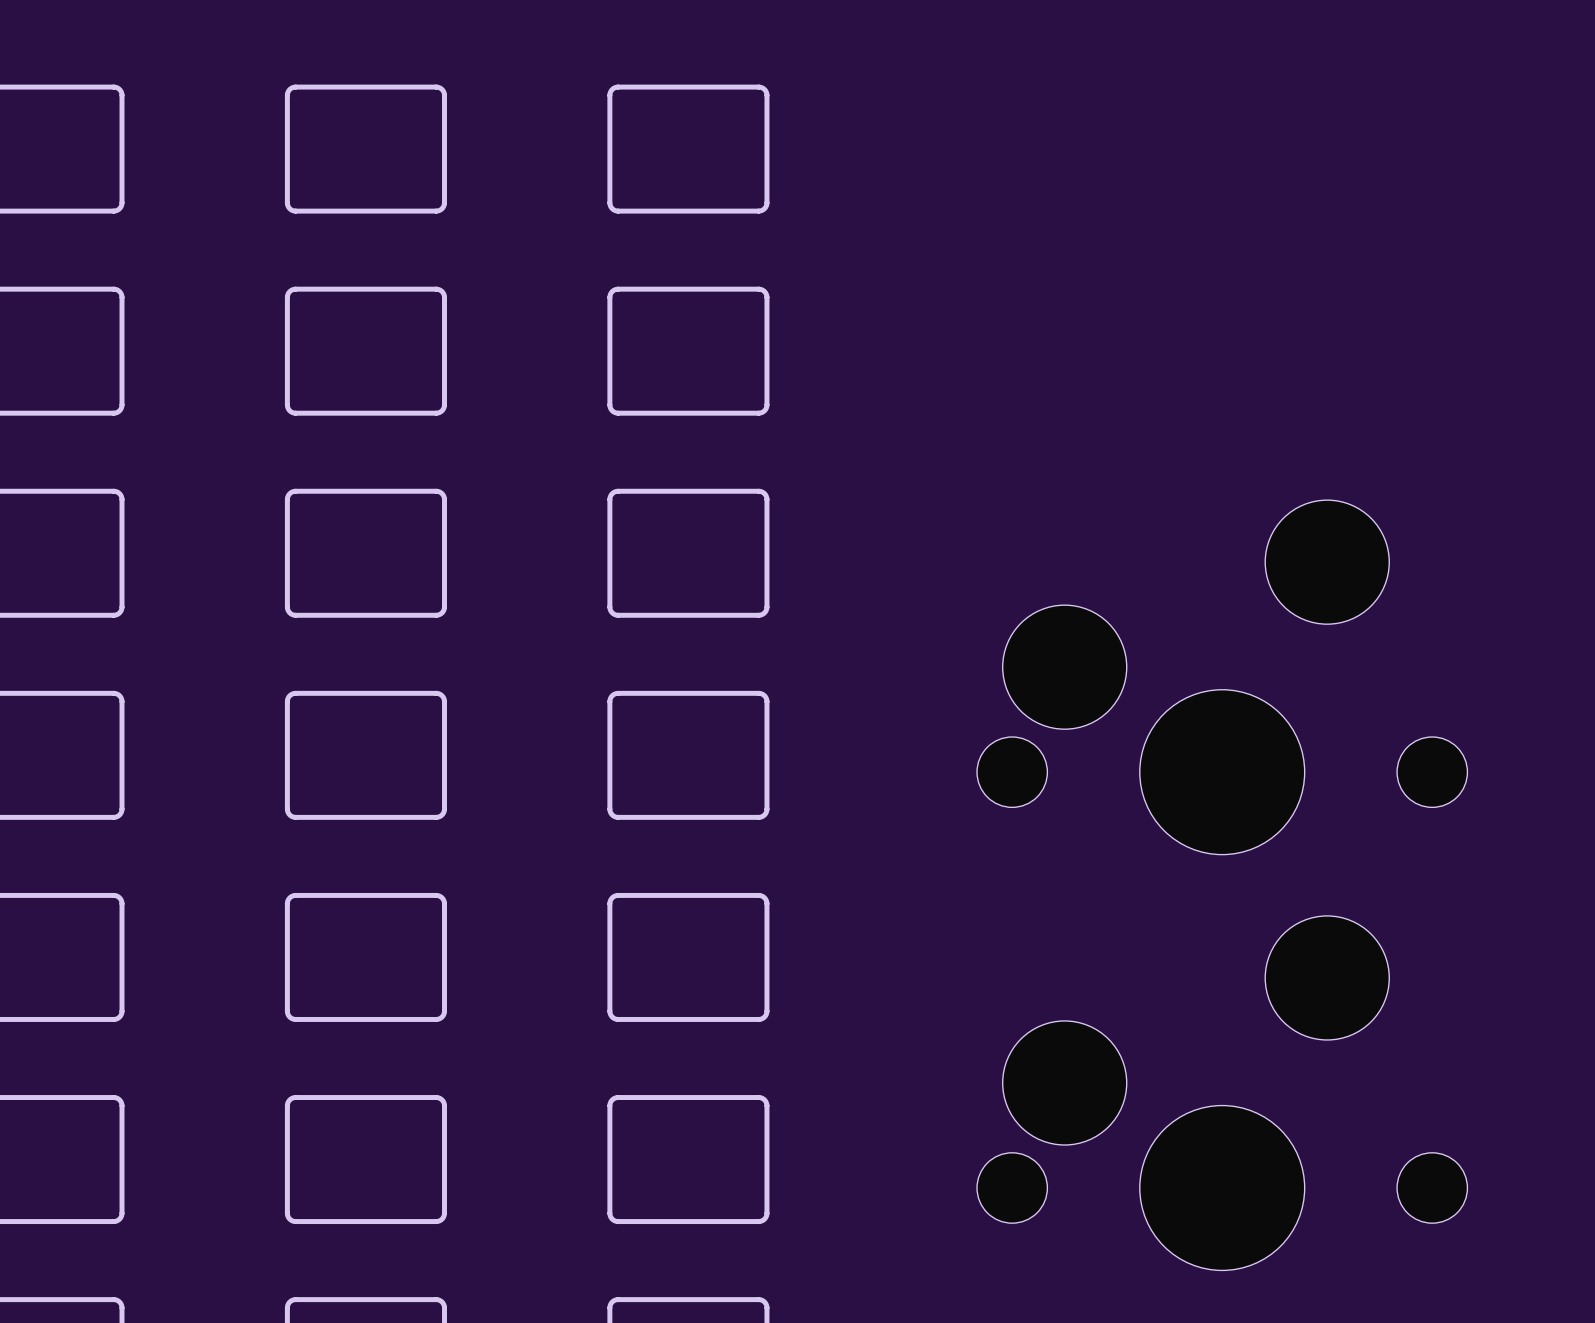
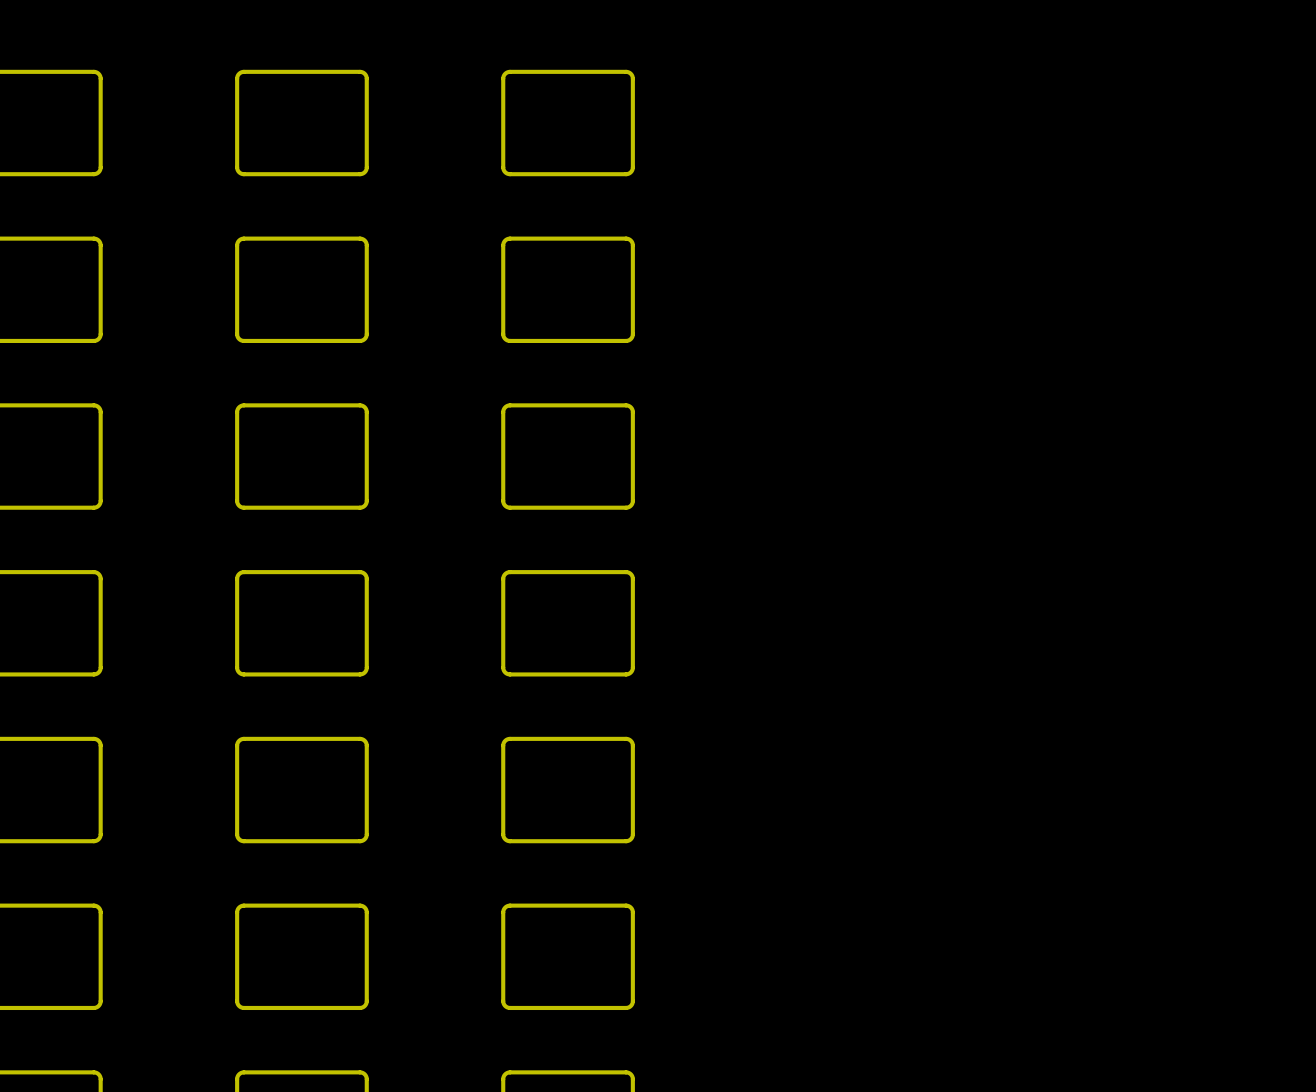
part: (1222, 677) -> none
part: (1222, 1093) -> none

